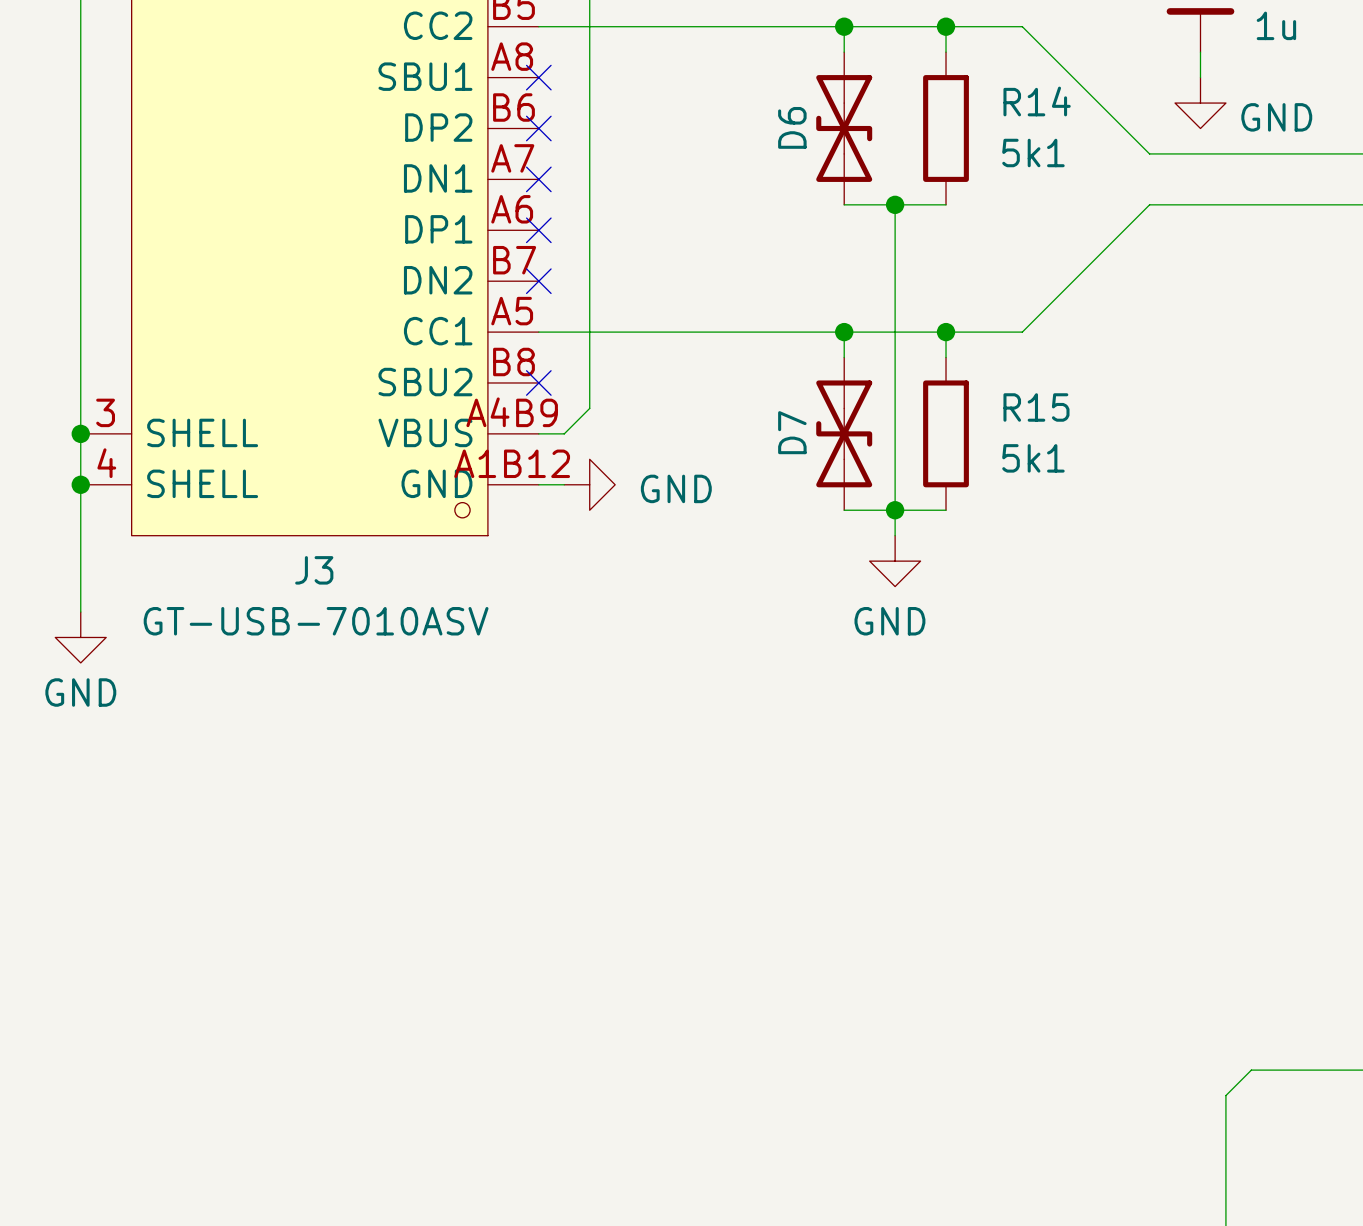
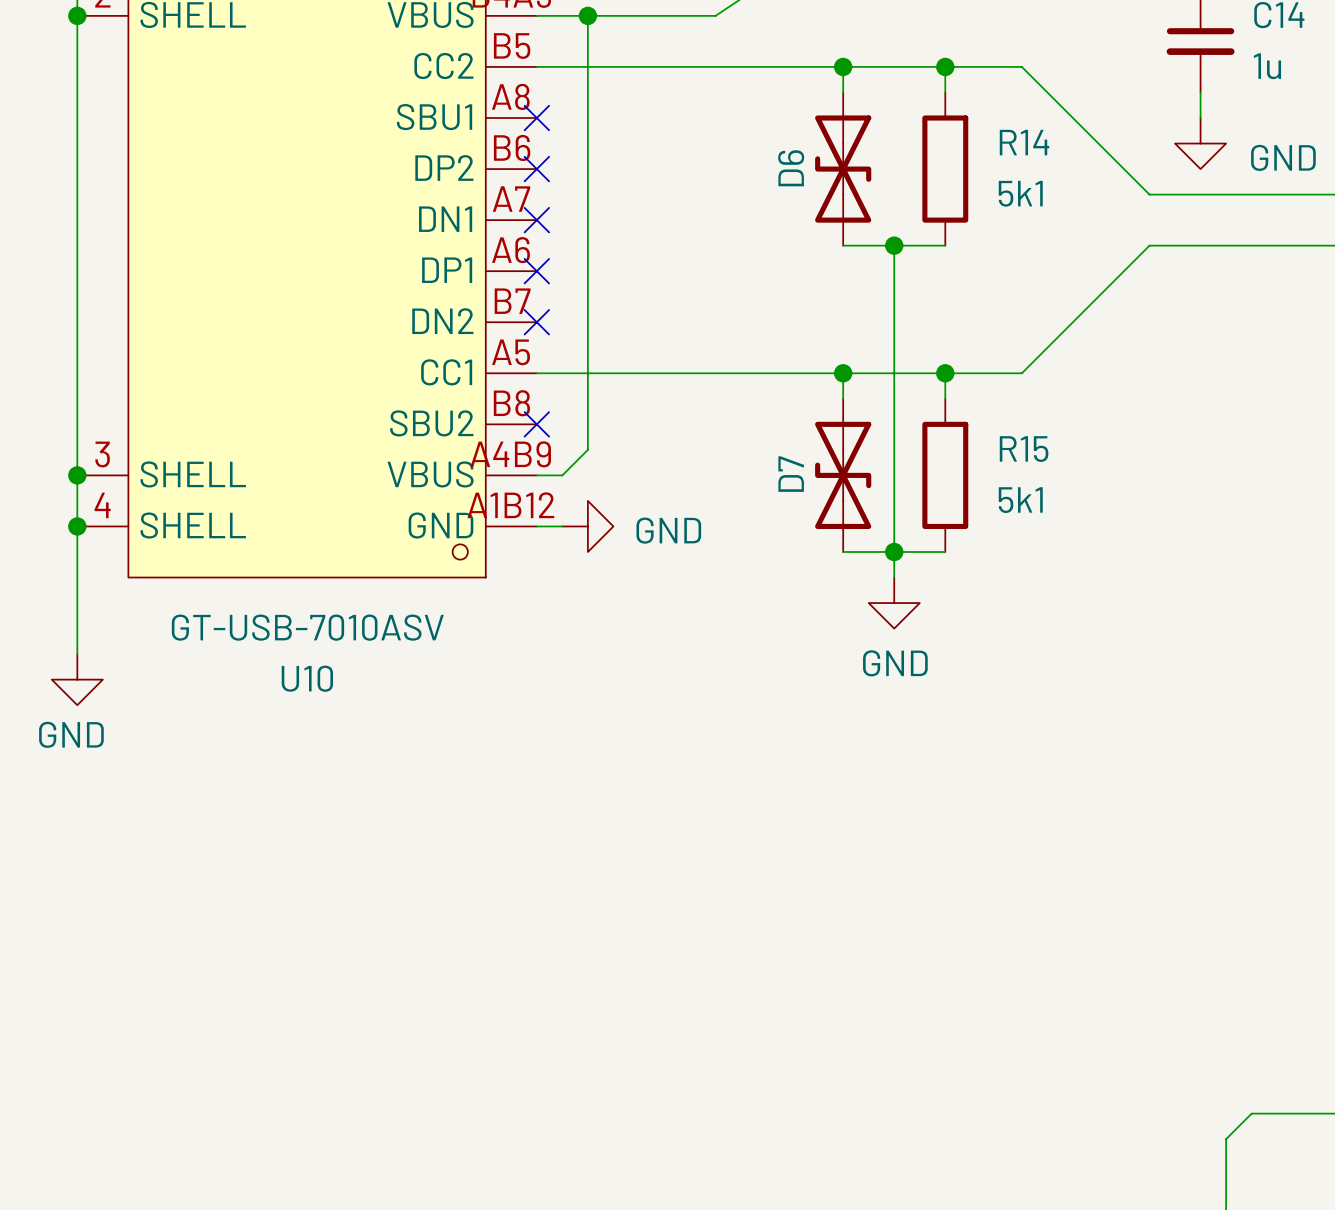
J3 name: J3 (314, 570) -> U10 (307, 678)
J3 value position: GT-USB-7010ASV (316, 621) -> GT-USB-7010ASV (307, 627)

